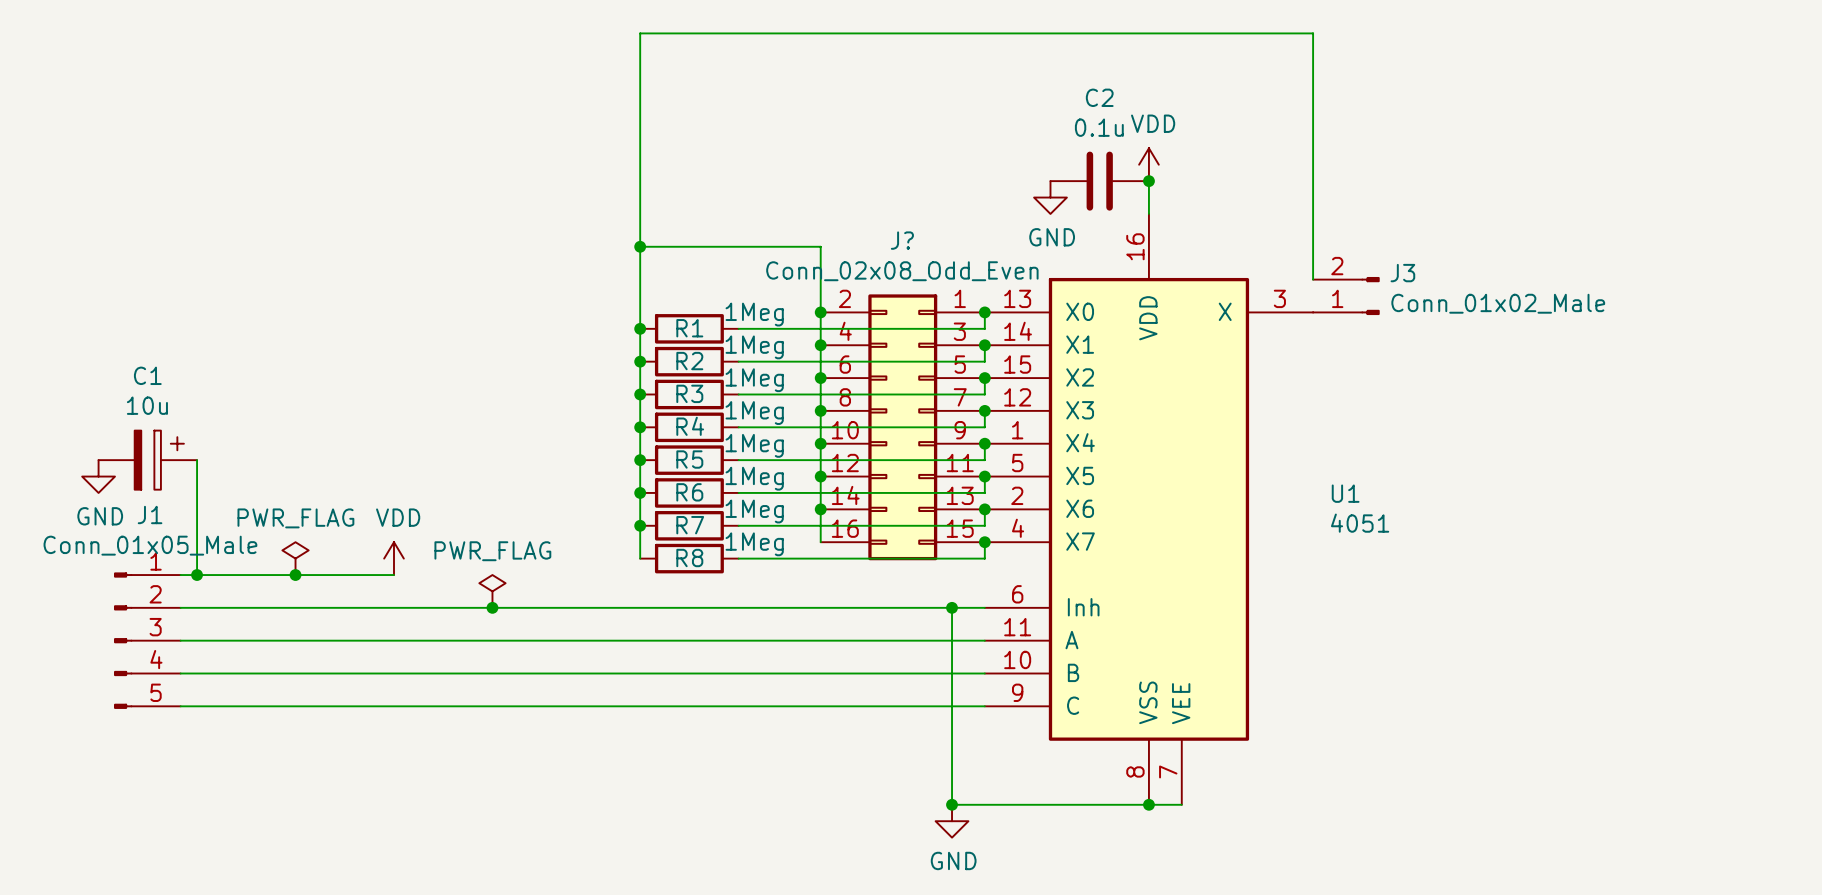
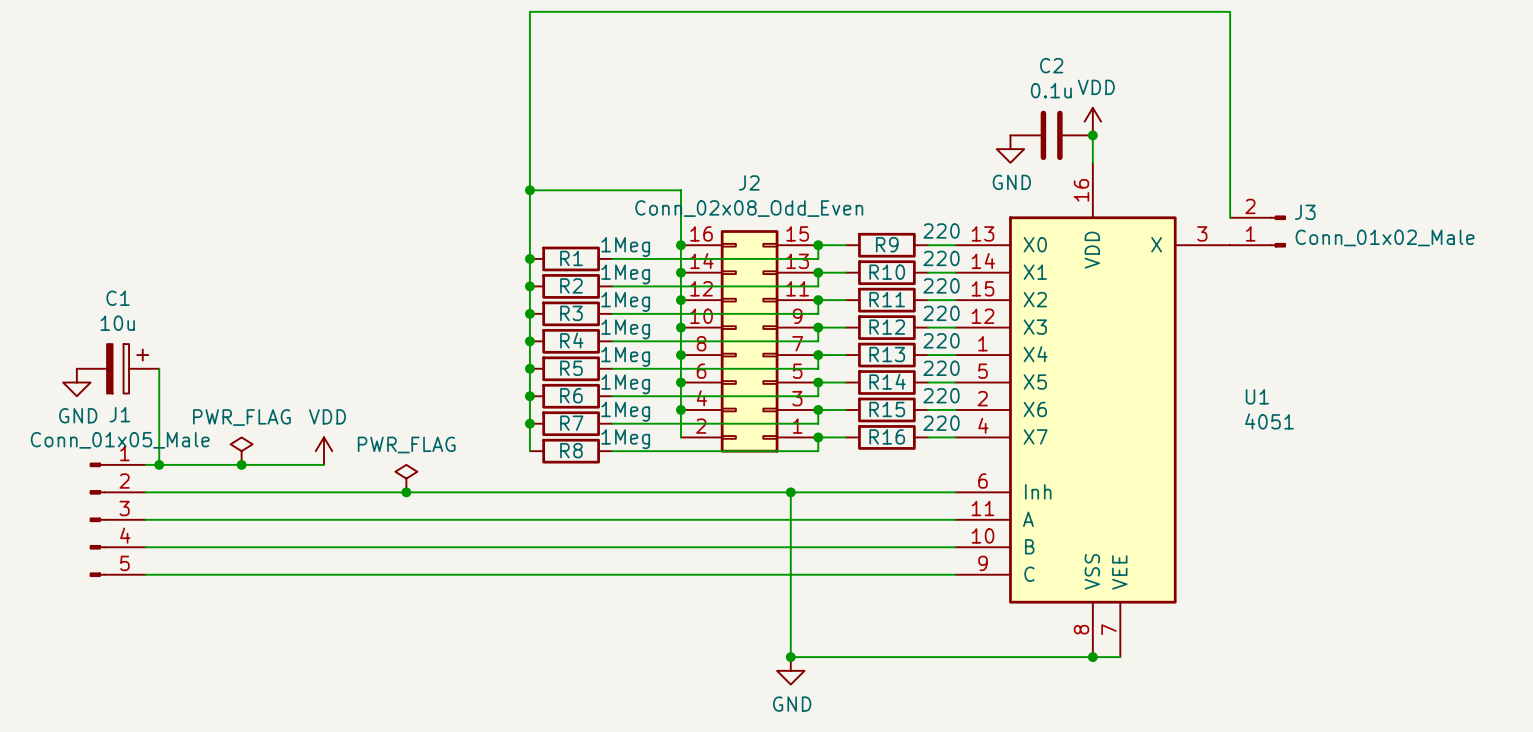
wire: (1313, 33) (1313, 181) -> (1092, 11) (1230, 11) (1230, 217)
power symbol position: VDD (1148, 164) -> VDD (1092, 121)
C2 position: (1099, 181) -> (1051, 135)
wire: (1148, 181) (1148, 213) -> none
junction: (1148, 181) -> none
junction: none -> (1092, 135)
power symbol position: GND (1050, 197) -> GND (1010, 149)
J? name: J? (902, 240) -> J2 (749, 182)
J3 position: (1346, 296) -> (1258, 231)
R9: none -> 220 (886, 245)
R10: none -> 220 (886, 272)
R11: none -> 220 (886, 300)
R12: none -> 220 (886, 327)
J? flip: as is (902, 427) -> up-down (749, 341)
R13: none -> 220 (886, 355)
R14: none -> 220 (886, 382)
R15: none -> 220 (886, 409)
U1 position: (1148, 509) -> (1092, 409)
R16: none -> 220 (886, 437)
junction: (1148, 804) -> none
wire: none -> (983, 657) (1120, 657)
junction: none -> (1092, 657)

